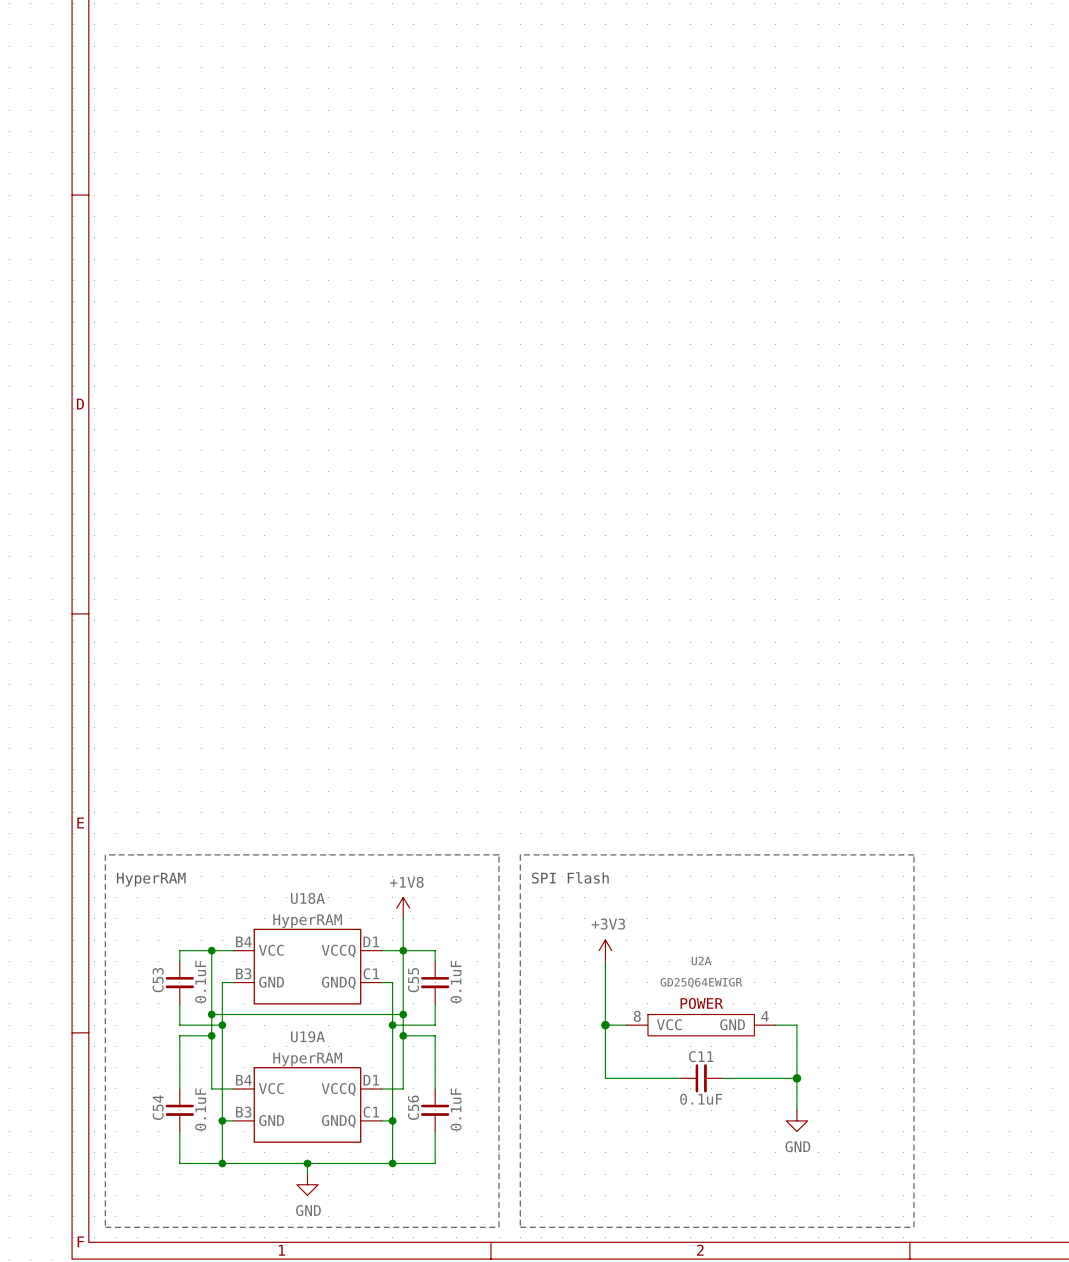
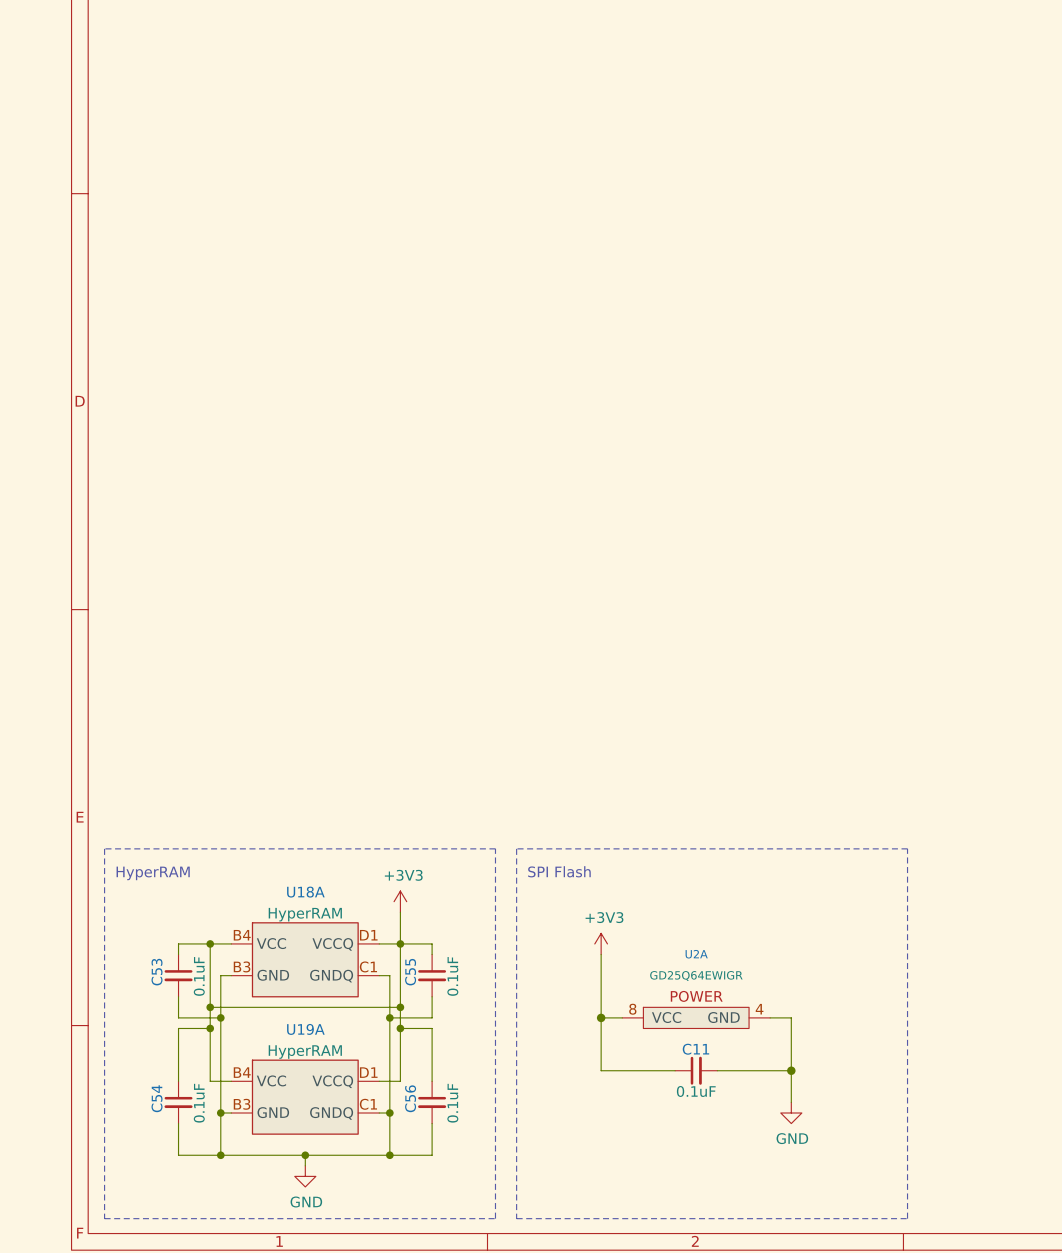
power symbol: +1V8 (403, 908) -> +3V3 (400, 901)

